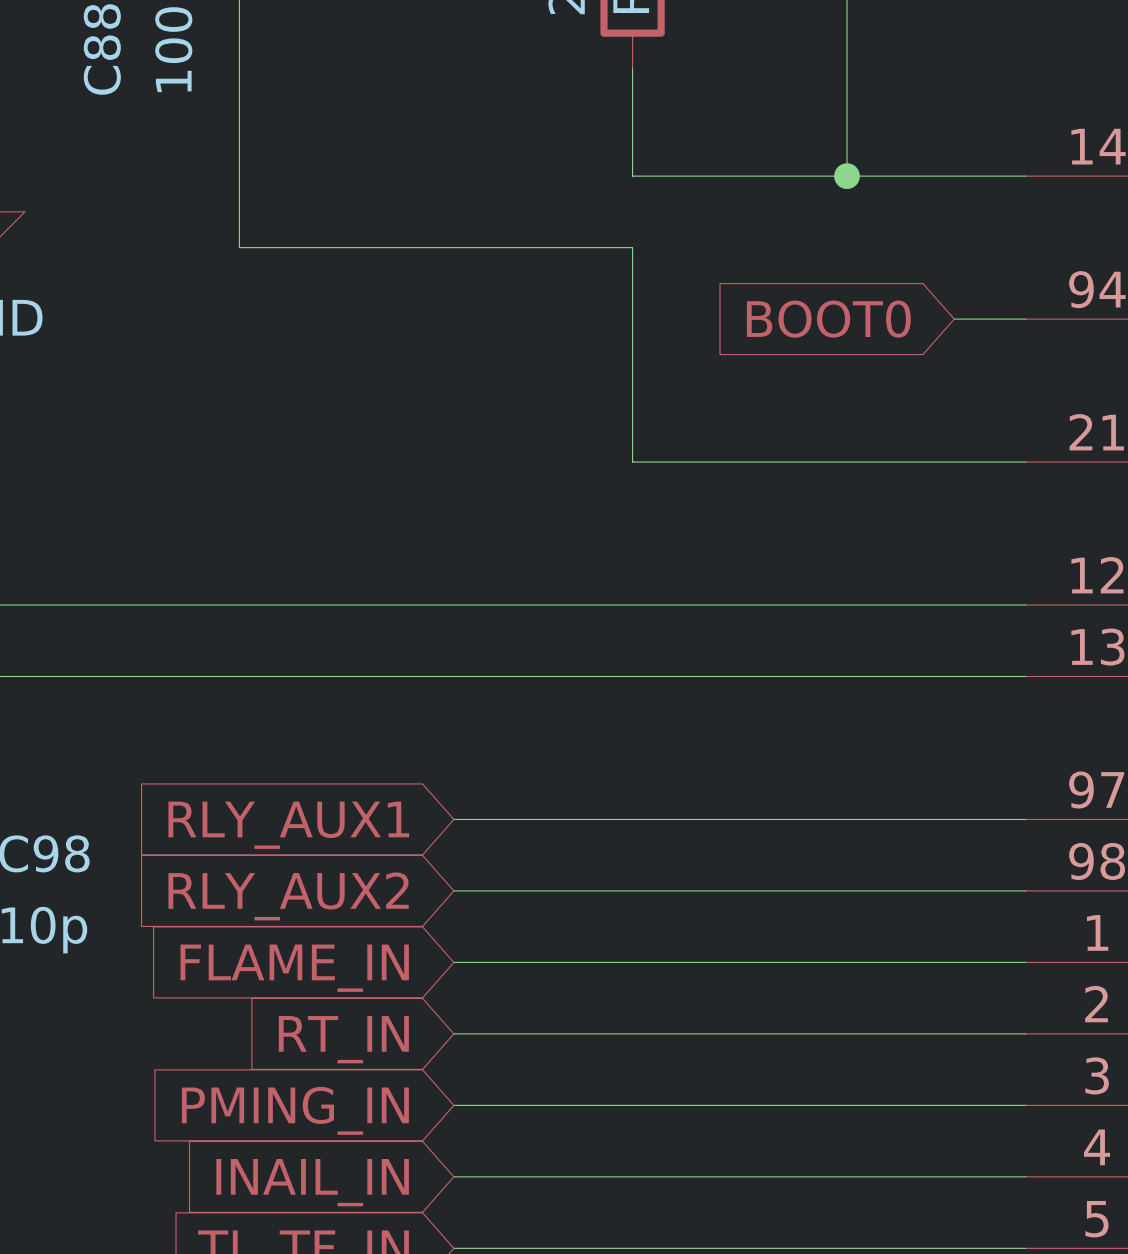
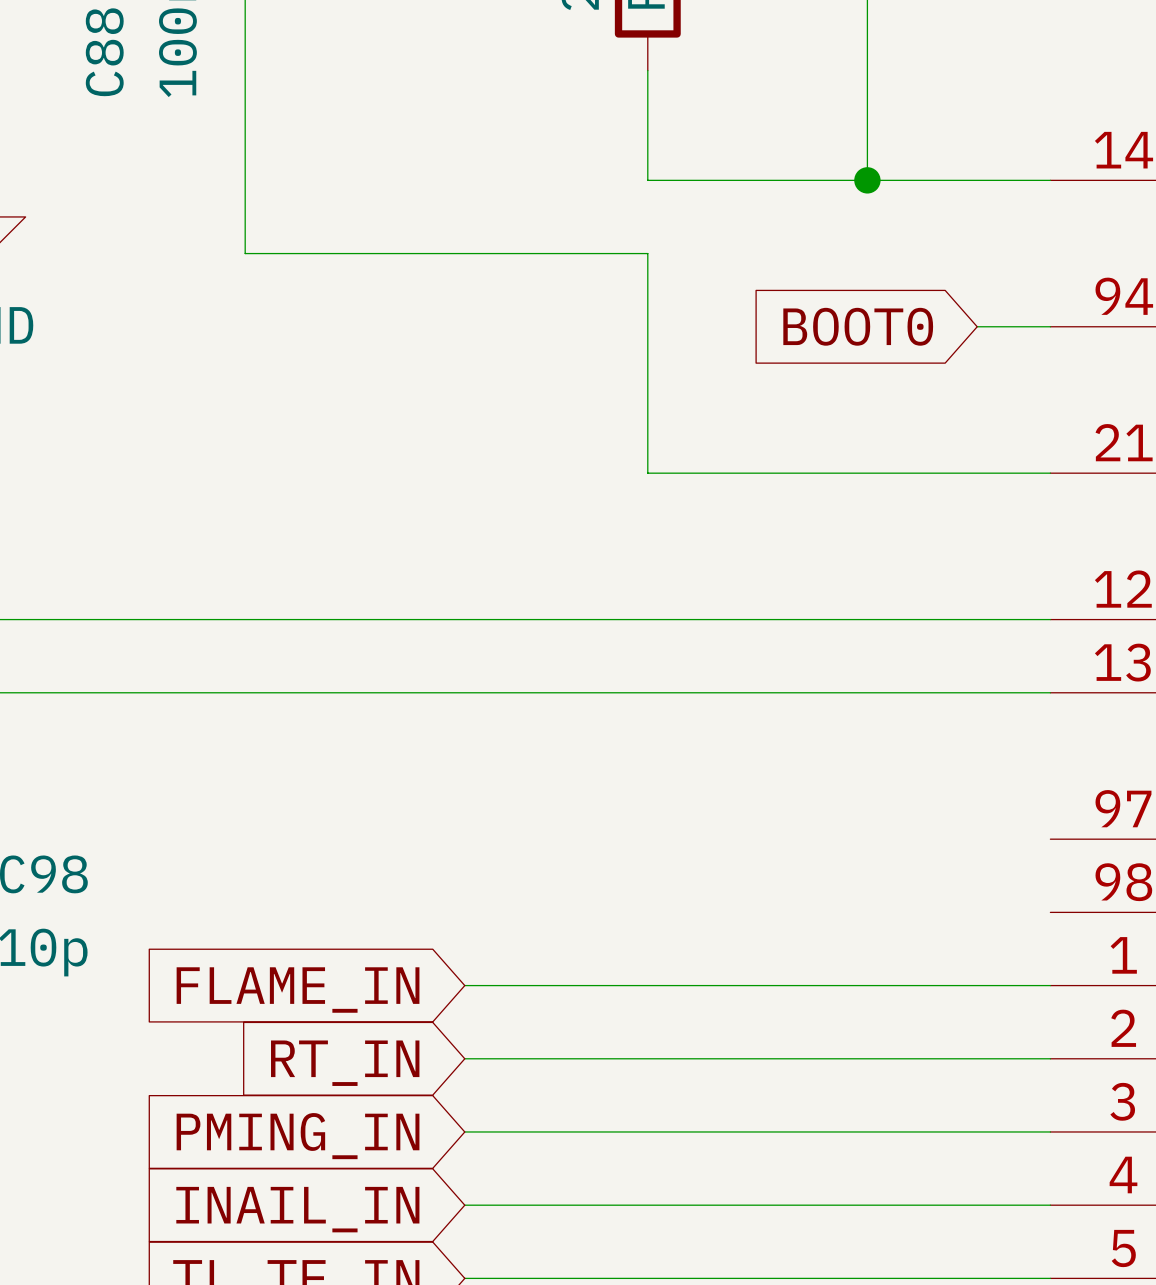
wire: (453, 819) (1025, 819) -> none
global label: RLY_AUX1 (288, 825) -> none
wire: (453, 890) (1025, 890) -> none
global label: RLY_AUX2 (288, 896) -> none

